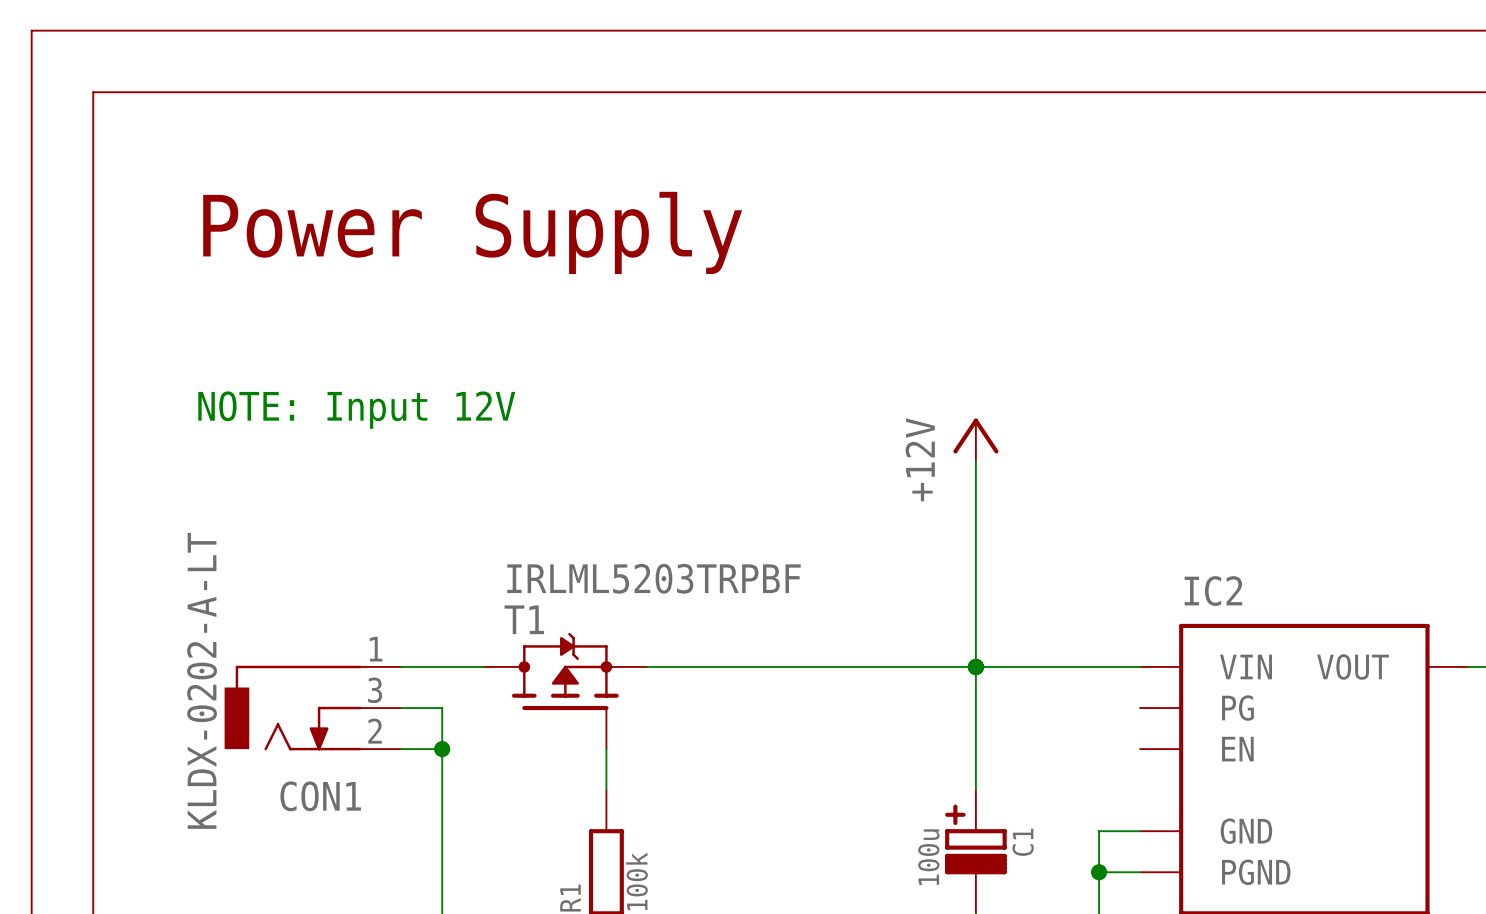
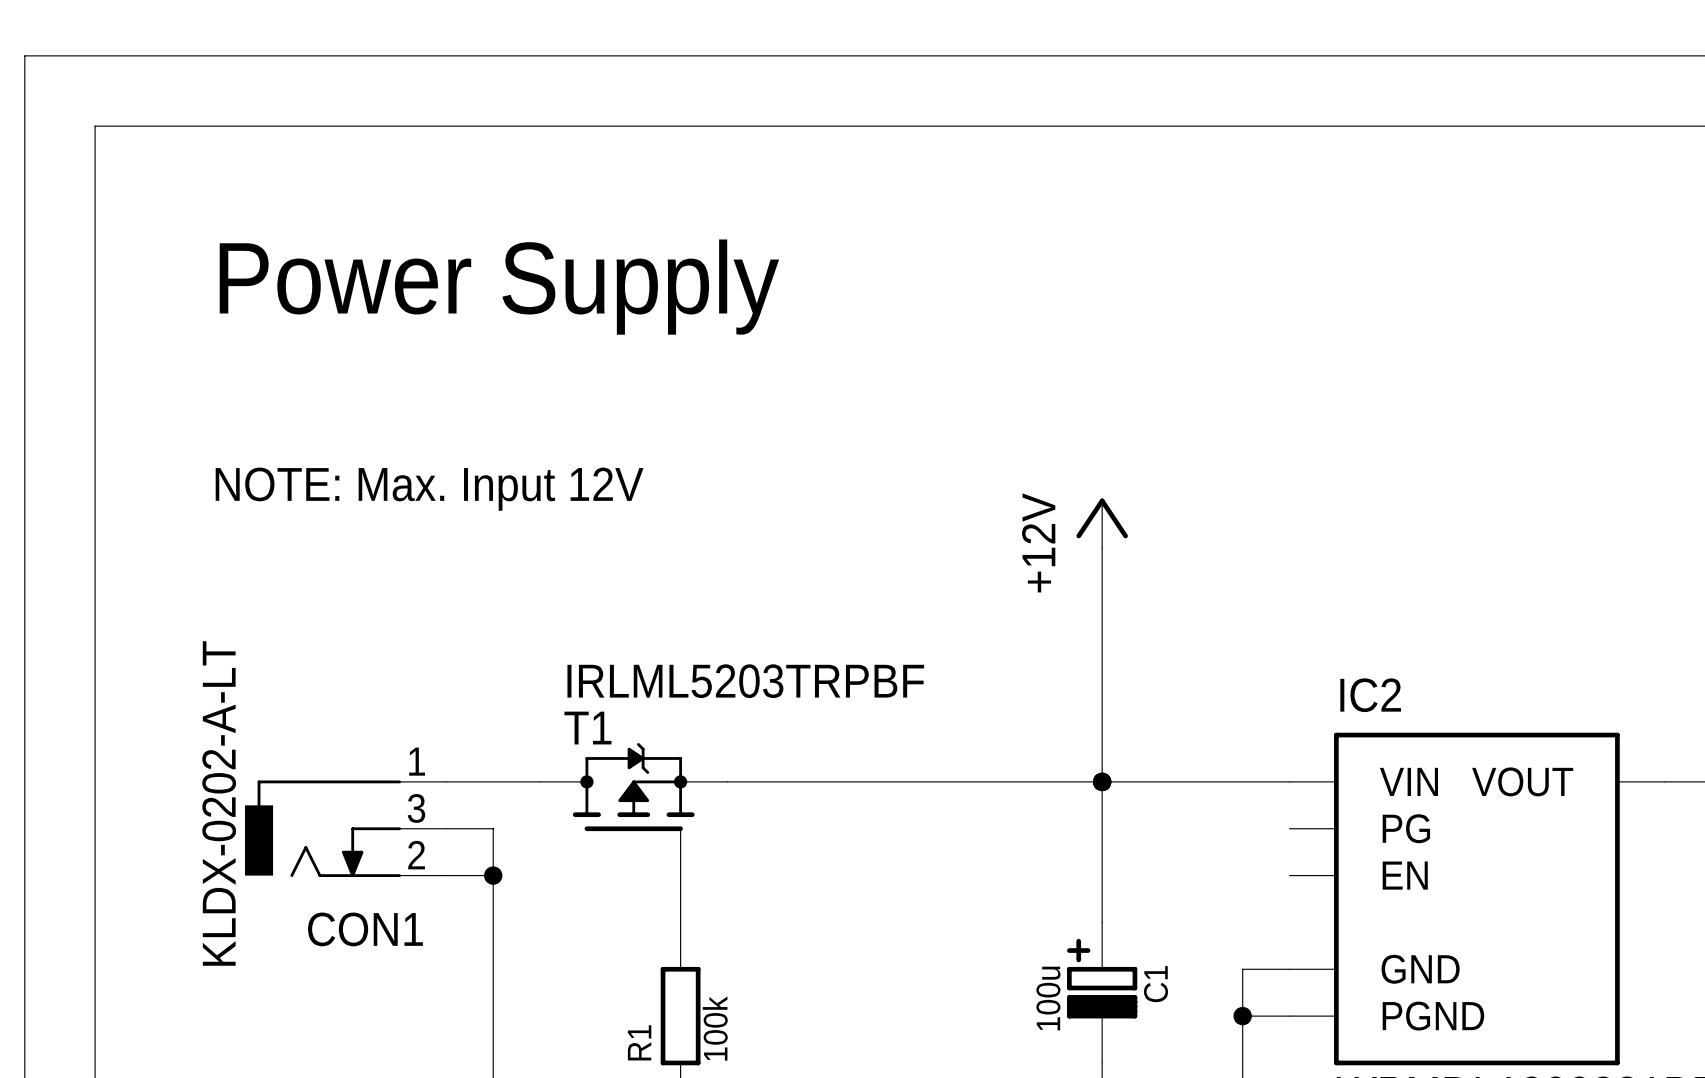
text: NOTE: Input 12V (356, 410) -> NOTE: Max. Input 12V (429, 489)

